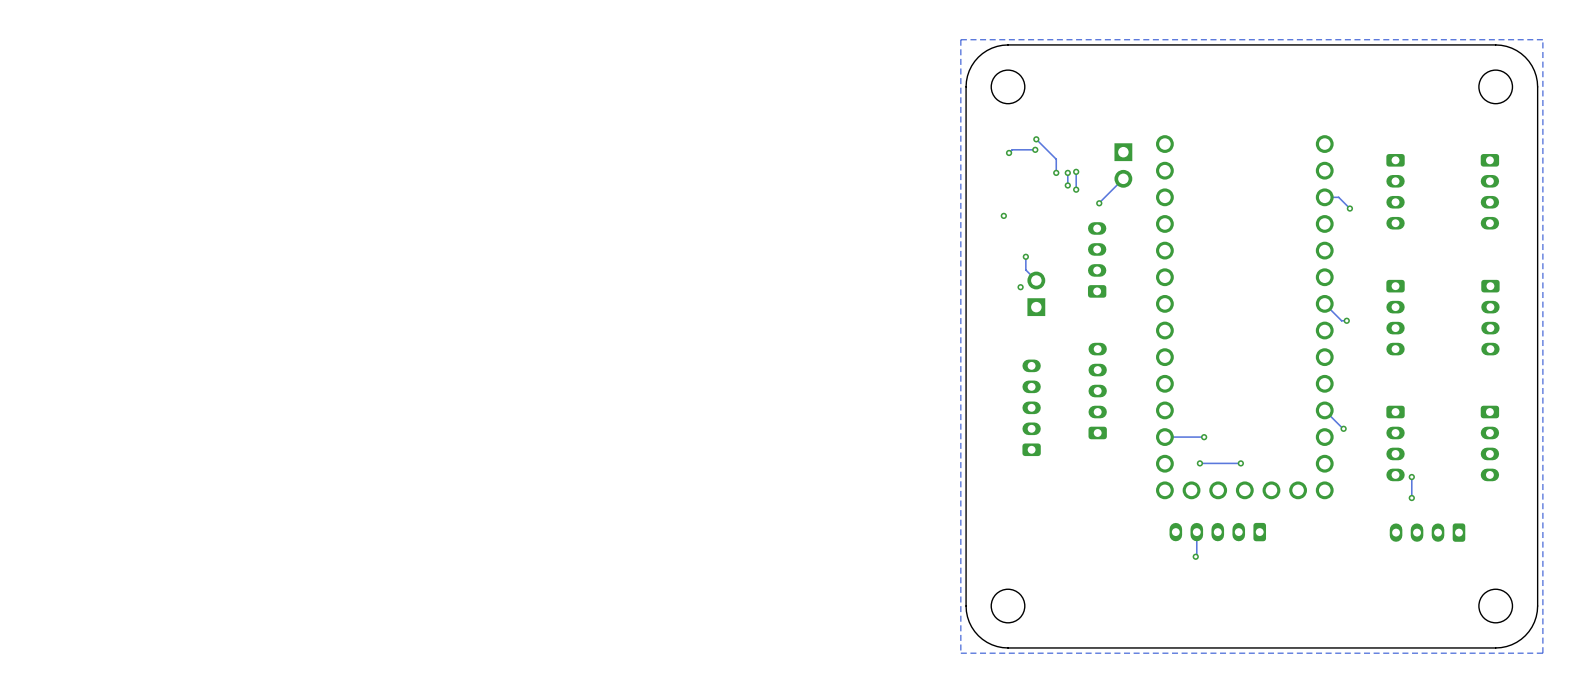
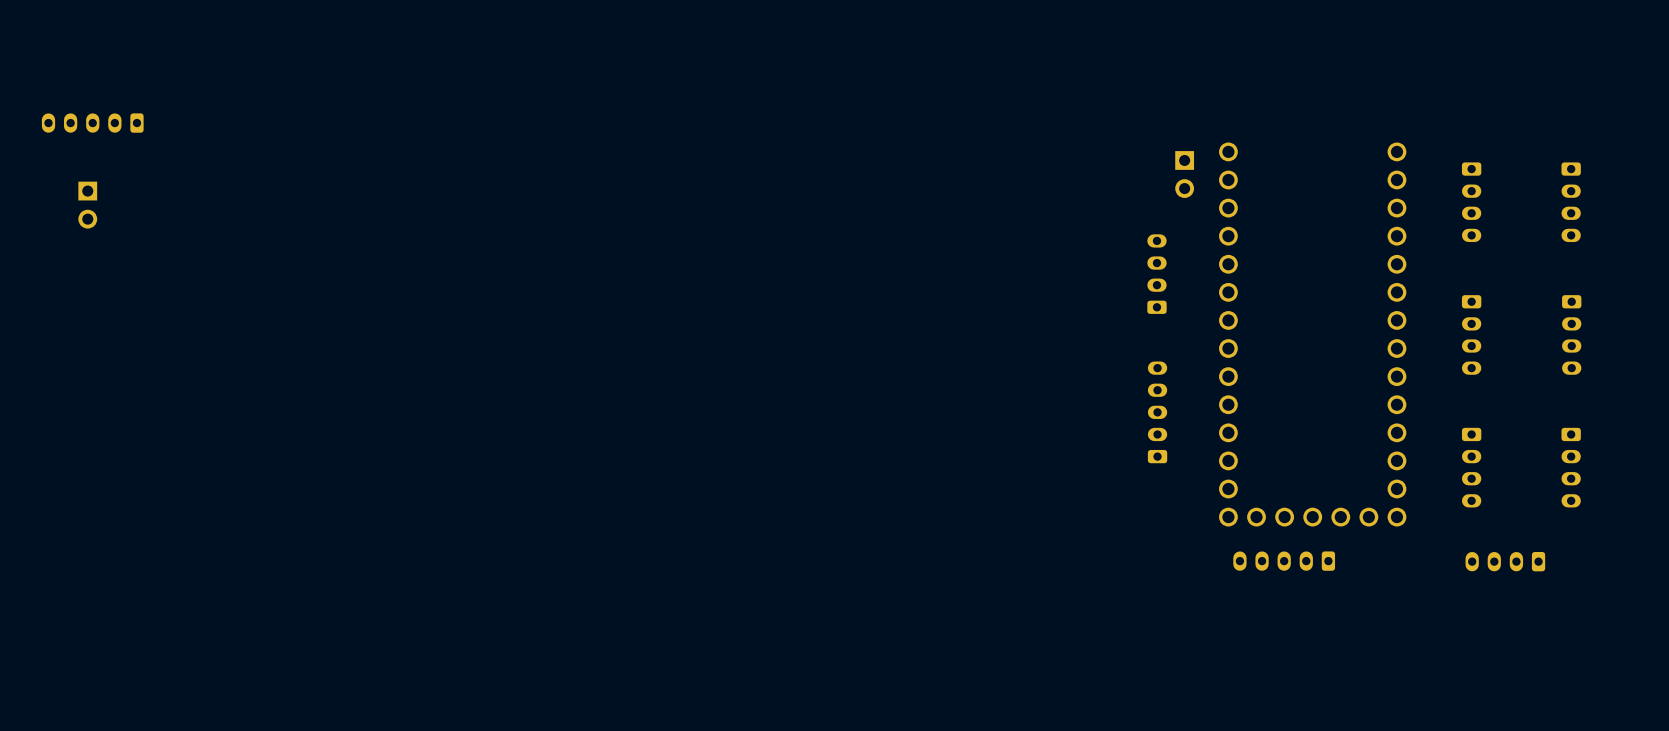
zone outline: (1542, 39) (960, 39) (960, 653) (1542, 653) (1542, 39) -> none
board edge: (1495, 44) (1008, 44) (987, 50) (974, 61) (967, 76) (966, 86) (966, 606) (969, 622) (982, 639) (991, 644) (1008, 647) (1495, 647) (1511, 644) (1528, 631) (1534, 622) (1537, 606) (1537, 86) (1534, 70) (1525, 57) (1511, 48) (1495, 44) -> none
round board edge: [990, 69, 1026, 105] -> none
round board edge: [1478, 69, 1513, 105] -> none
part: none -> (92, 123)
track: (1036, 139) (1056, 159) (1056, 172) -> none
via: (1036, 139) -> none
track: (1035, 149) (1012, 149) (1009, 152) -> none
via: (1035, 149) -> none
via: (1009, 152) -> none
track: (1076, 171) (1076, 189) -> none
via: (1076, 171) -> none
via: (1056, 172) -> none
track: (1067, 172) (1067, 185) -> none
via: (1067, 172) -> none
track: (1123, 178) (1099, 203) -> none
via: (1067, 185) -> none
via: (1076, 189) -> none
part: none -> (87, 205)
track: (1324, 197) (1338, 197) (1349, 208) -> none
via: (1099, 203) -> none
via: (1349, 208) -> none
via: (1003, 215) -> none
track: (1025, 256) (1025, 270) (1036, 280) -> none
via: (1025, 256) -> none
via: (1020, 287) -> none
part: (1036, 293) -> none
track: (1324, 303) (1341, 320) (1346, 320) -> none
via: (1346, 320) -> none
part: (1031, 407) -> none
track: (1324, 410) (1343, 428) -> none
via: (1343, 428) -> none
track: (1204, 437) (1164, 437) -> none
via: (1204, 437) -> none
via: (1199, 463) -> none
track: (1240, 463) (1199, 463) -> none
via: (1240, 463) -> none
track: (1411, 477) (1411, 498) -> none
via: (1411, 477) -> none
via: (1411, 498) -> none
track: (1196, 532) (1195, 556) -> none
via: (1195, 556) -> none
round board edge: [990, 588, 1026, 624] -> none
round board edge: [1478, 588, 1513, 624] -> none

